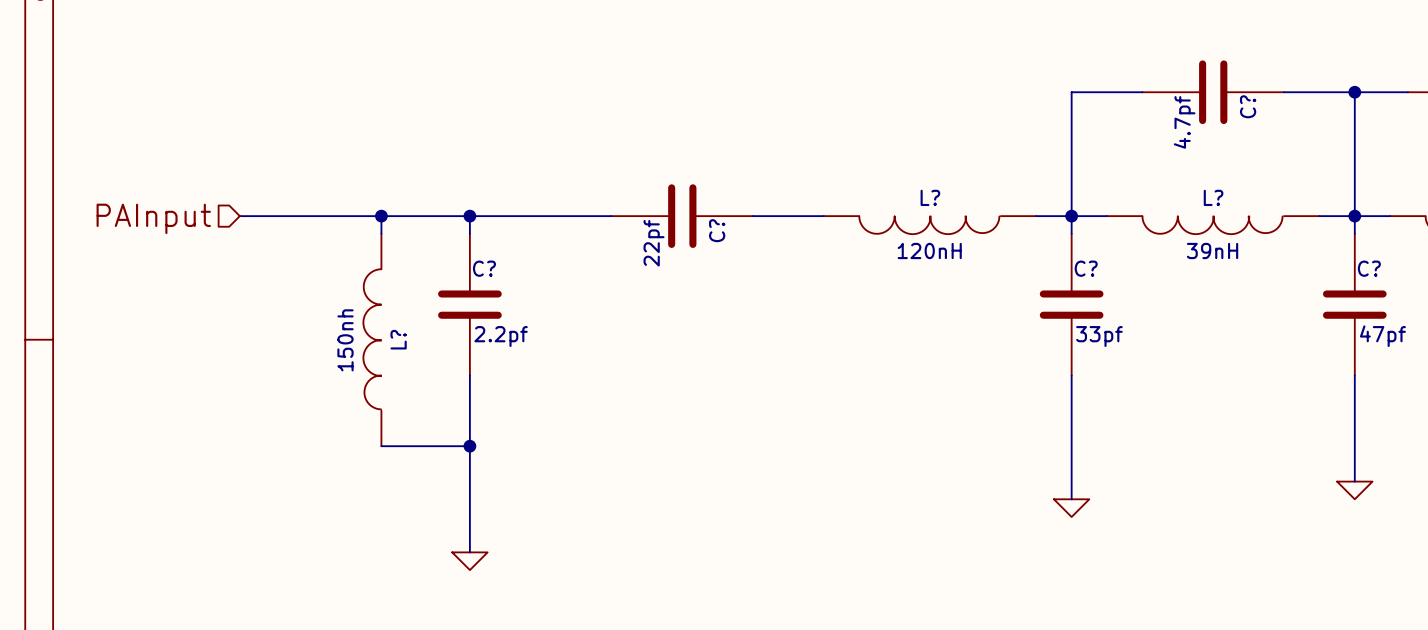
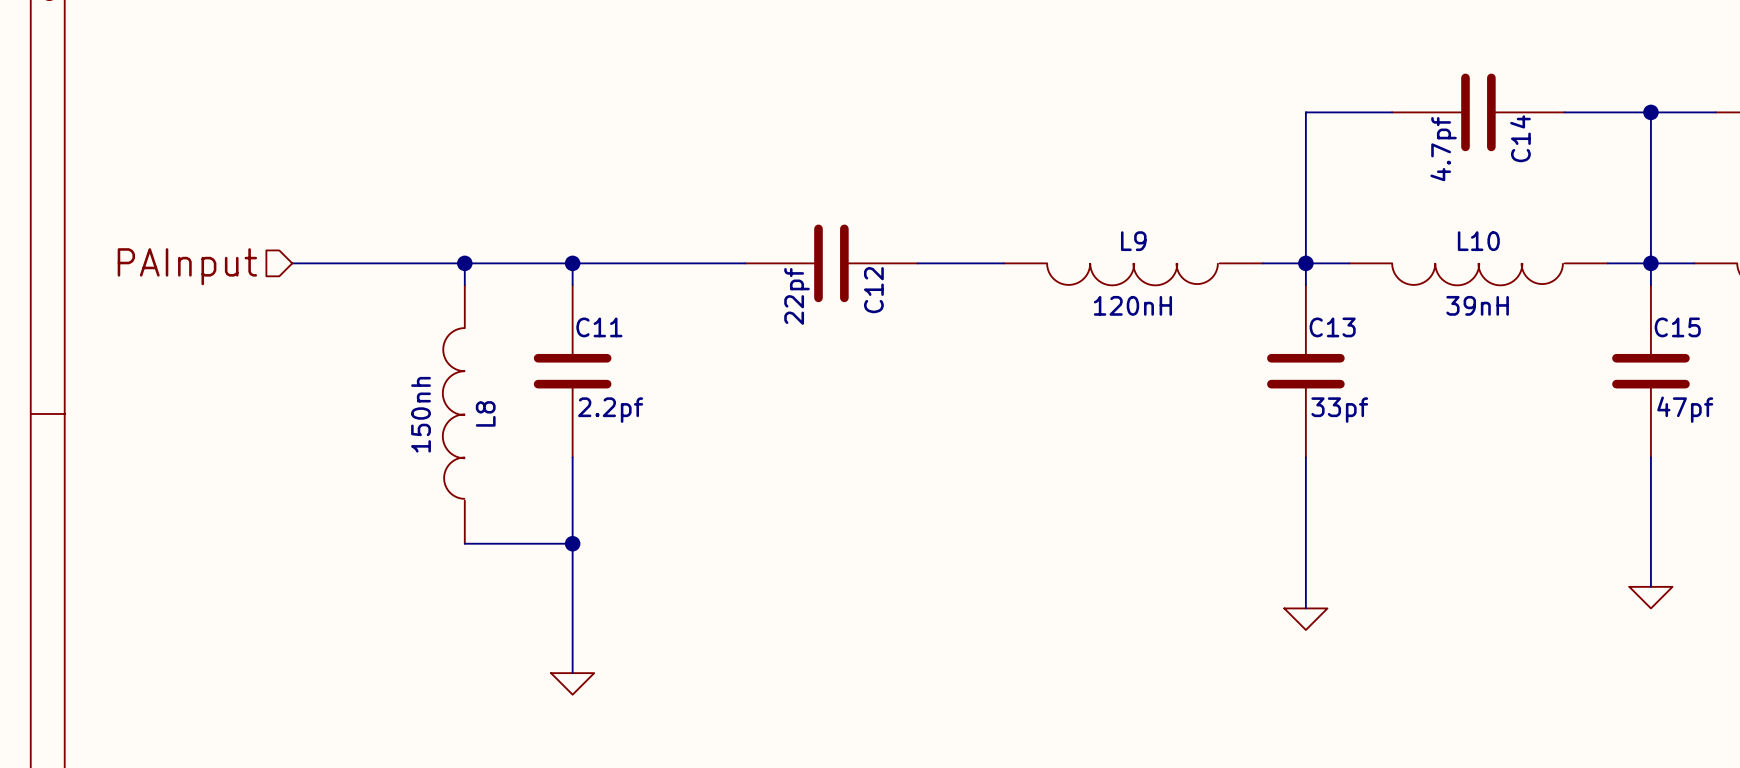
C? name: C? (1248, 106) -> C14 (1520, 138)
L? name: L? (930, 197) -> L9 (1133, 241)
L? name: L? (1213, 197) -> L10 (1478, 241)
C? name: C? (717, 230) -> C12 (873, 290)
C? name: C? (484, 268) -> C11 (599, 327)
C? name: C? (1086, 268) -> C13 (1332, 327)
C? name: C? (1369, 268) -> C15 (1677, 327)
L? name: L? (398, 339) -> L8 (485, 413)

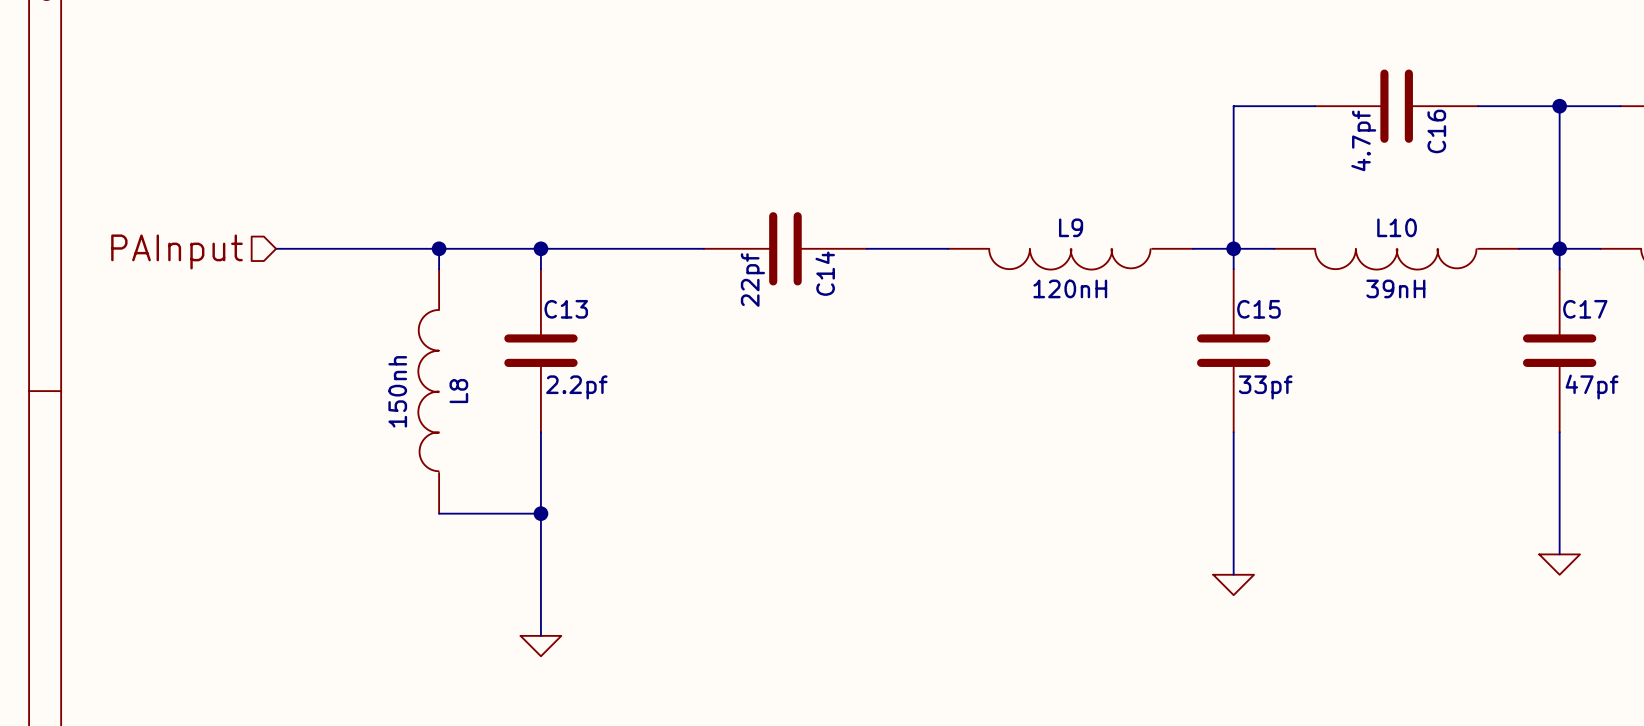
C14 name: C14 (1520, 138) -> C16 (1436, 131)
C12 name: C12 (873, 290) -> C14 (825, 273)
C11 name: C11 (599, 327) -> C13 (566, 309)
C13 name: C13 (1332, 327) -> C15 (1258, 309)
C15 name: C15 (1677, 327) -> C17 (1585, 309)

